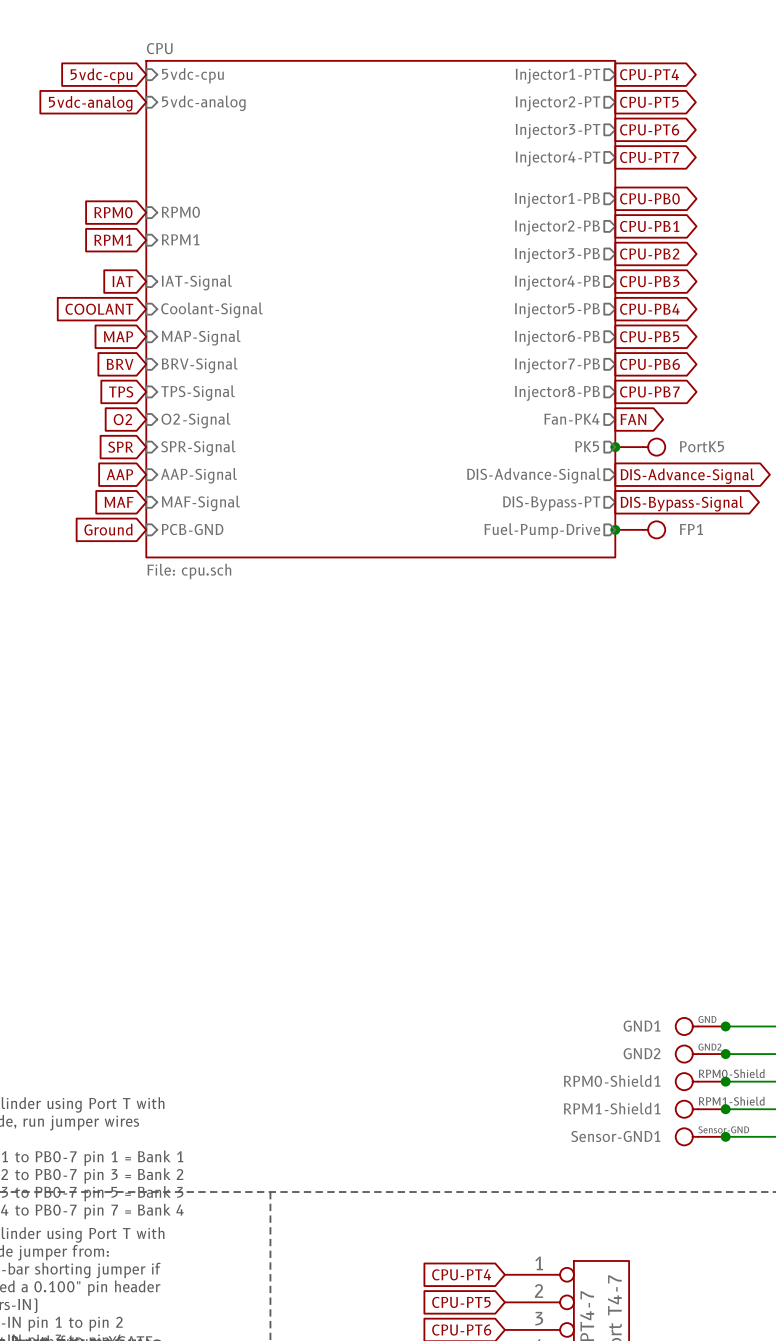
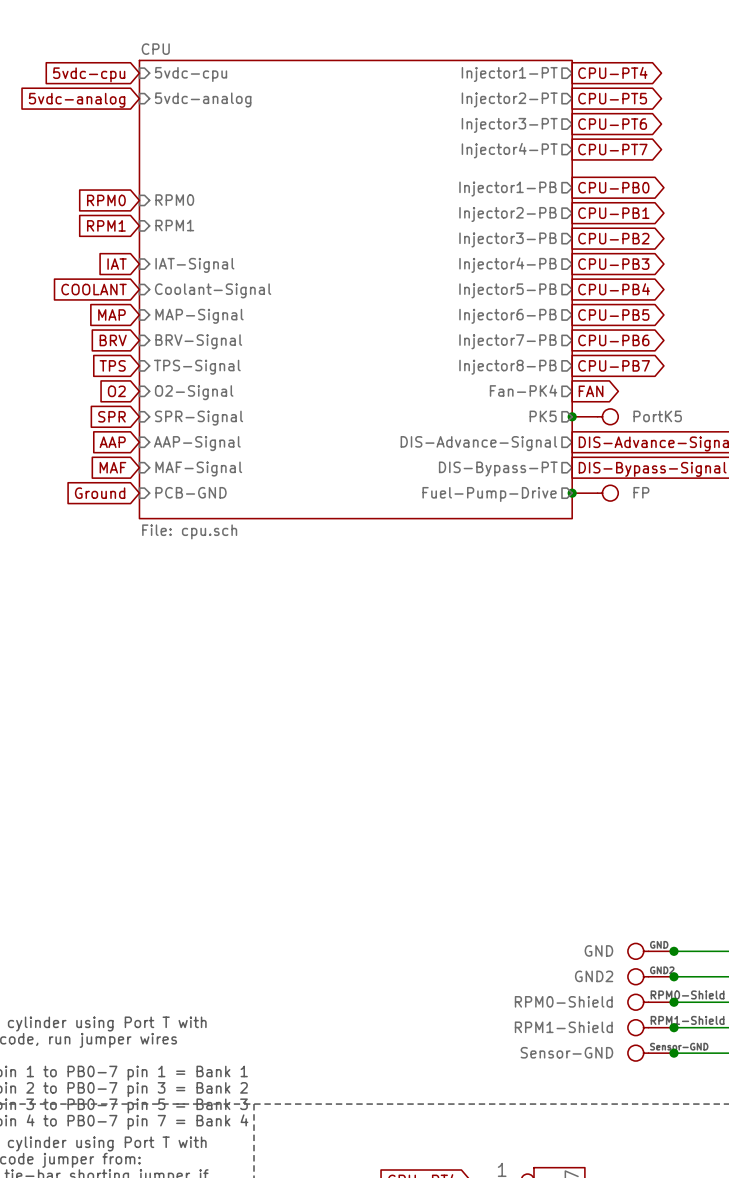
FP1 name: FP1 (691, 529) -> FP (641, 492)
GND1 name: GND1 (642, 1026) -> GND (598, 950)
RPM0-Shield1 name: RPM0-Shield1 (612, 1080) -> RPM0-Shield (563, 1001)
RPM1-Shield1 name: RPM1-Shield1 (612, 1108) -> RPM1-Shield (563, 1027)
Sensor-GND1 name: Sensor-GND1 (615, 1136) -> Sensor-GND (566, 1052)

